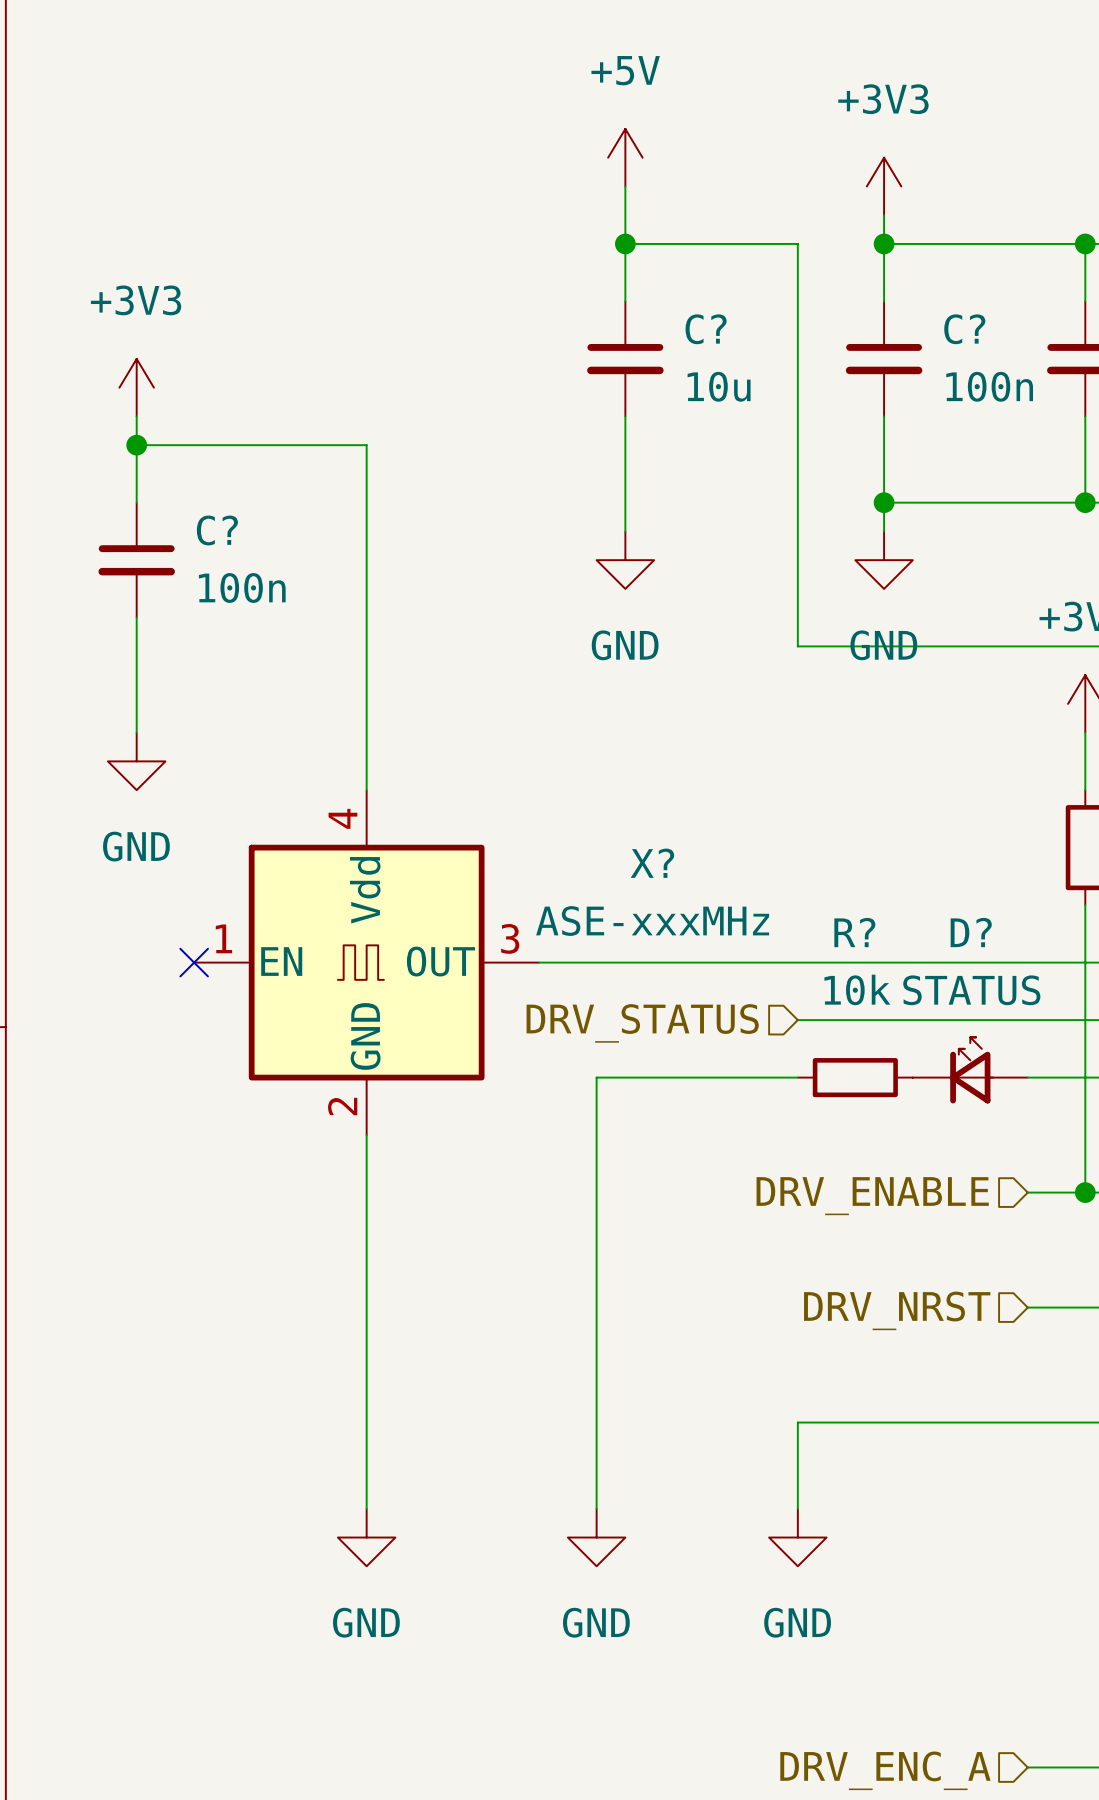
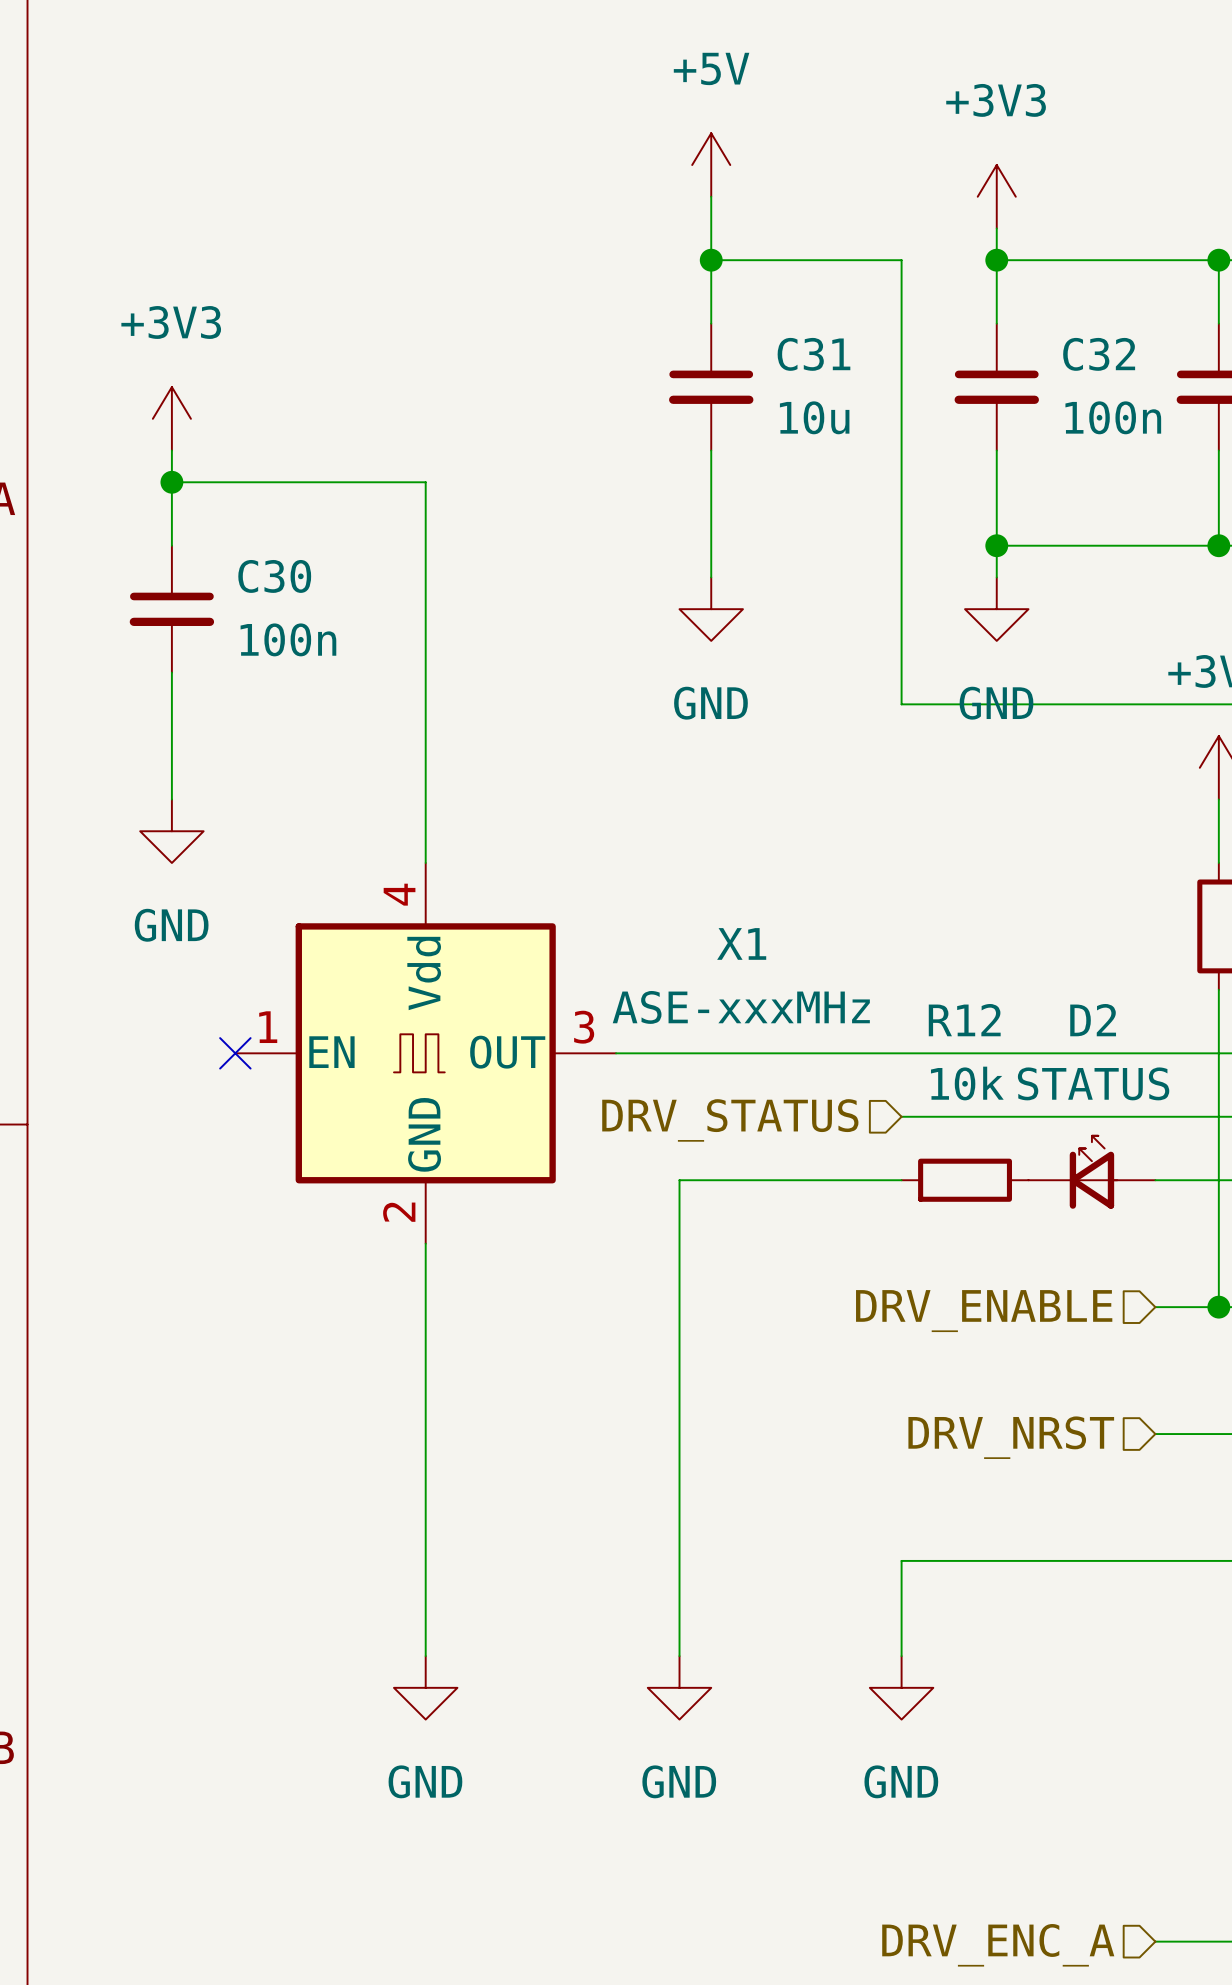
C? name: C? (706, 329) -> C31 (813, 354)
C? name: C? (964, 329) -> C32 (1099, 354)
C? name: C? (217, 530) -> C30 (274, 576)
X? name: X? (652, 863) -> X1 (741, 943)
R? name: R? (854, 932) -> R12 (964, 1020)
D? name: D? (971, 932) -> D2 (1093, 1020)

